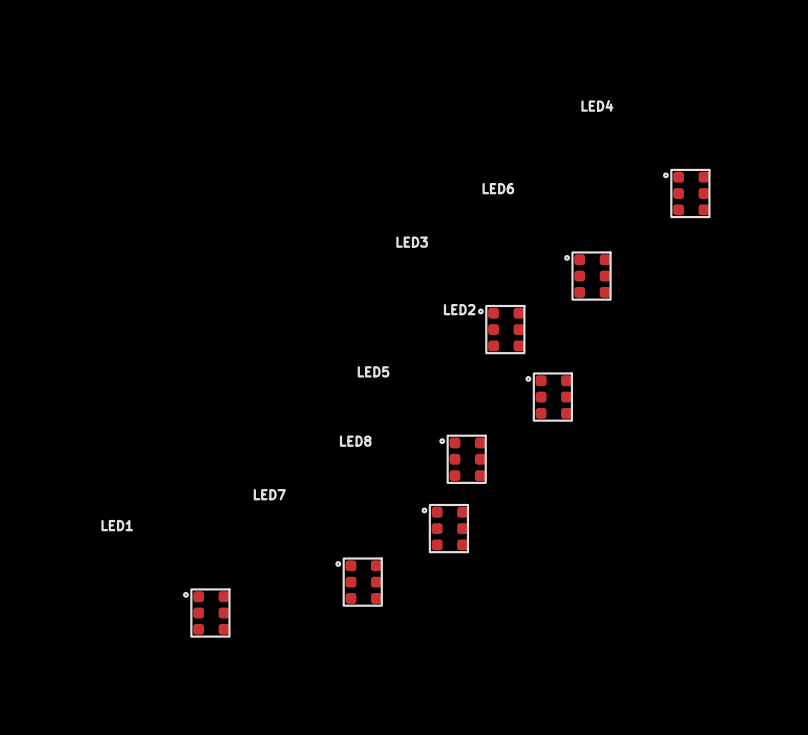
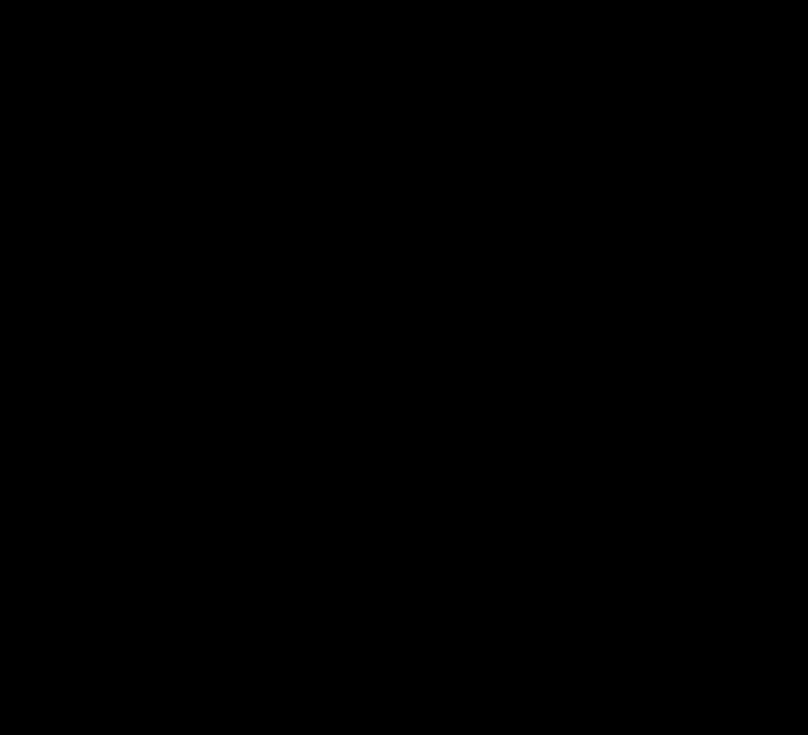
LED4: (686, 193) -> none
LED6: (587, 276) -> none
LED3: (501, 329) -> none
LED2: (549, 397) -> none
LED5: (463, 459) -> none
LED8: (445, 528) -> none
LED7: (359, 582) -> none
LED1: (206, 613) -> none

